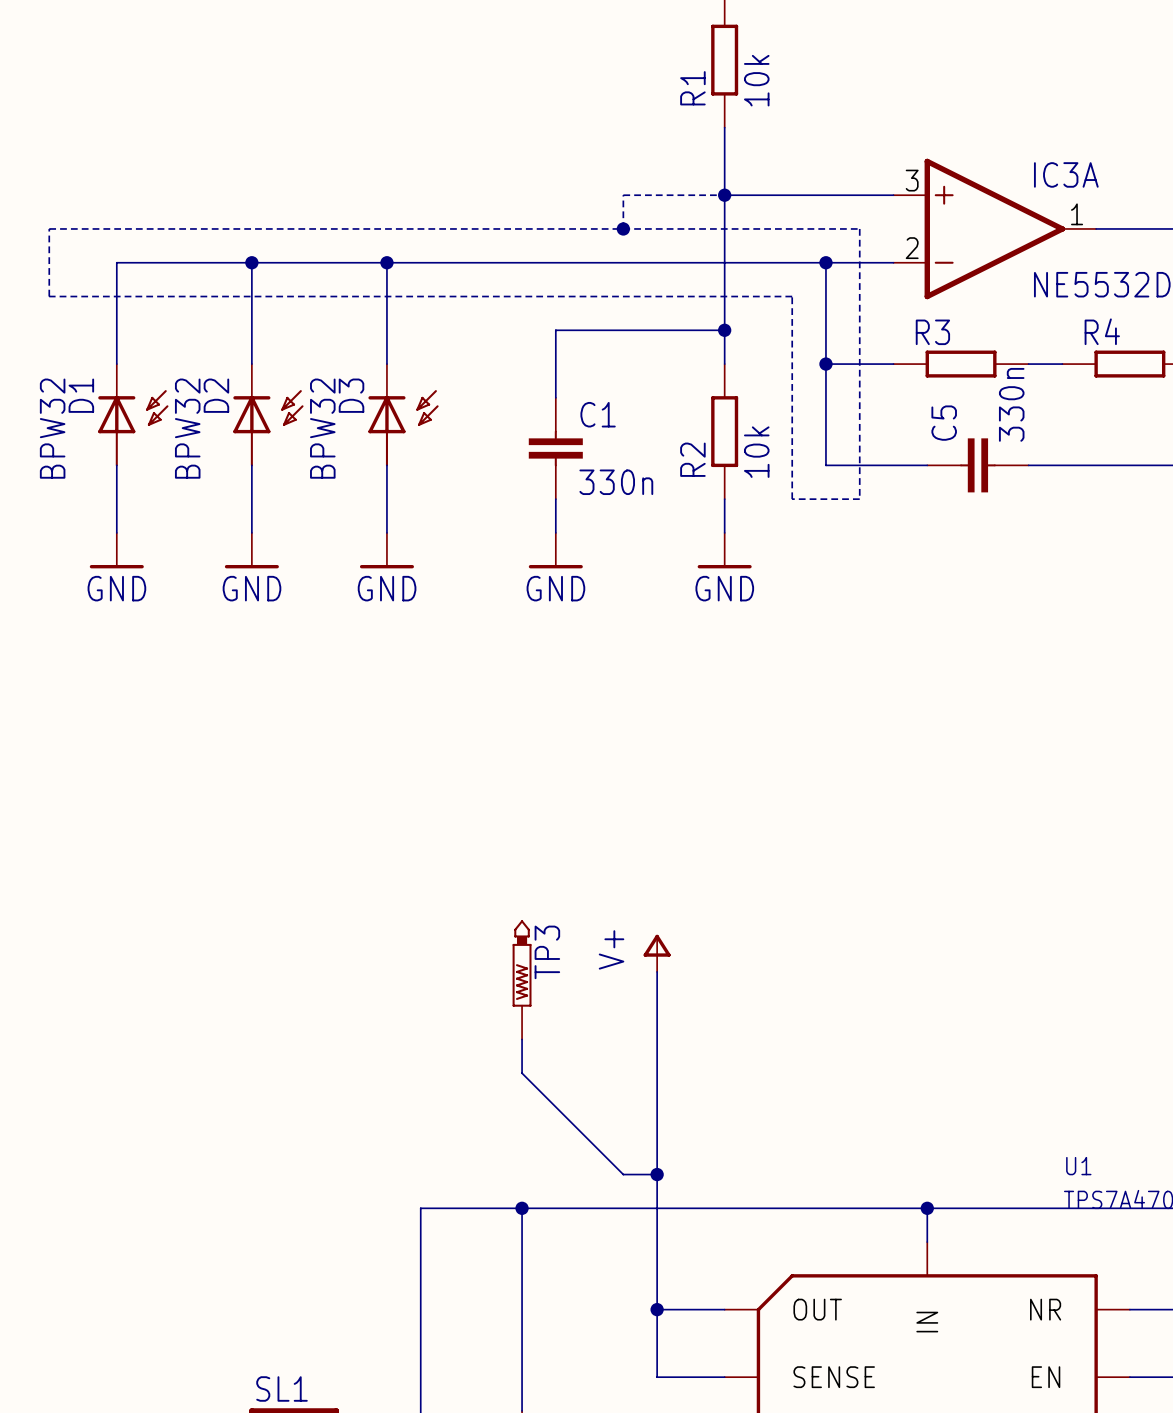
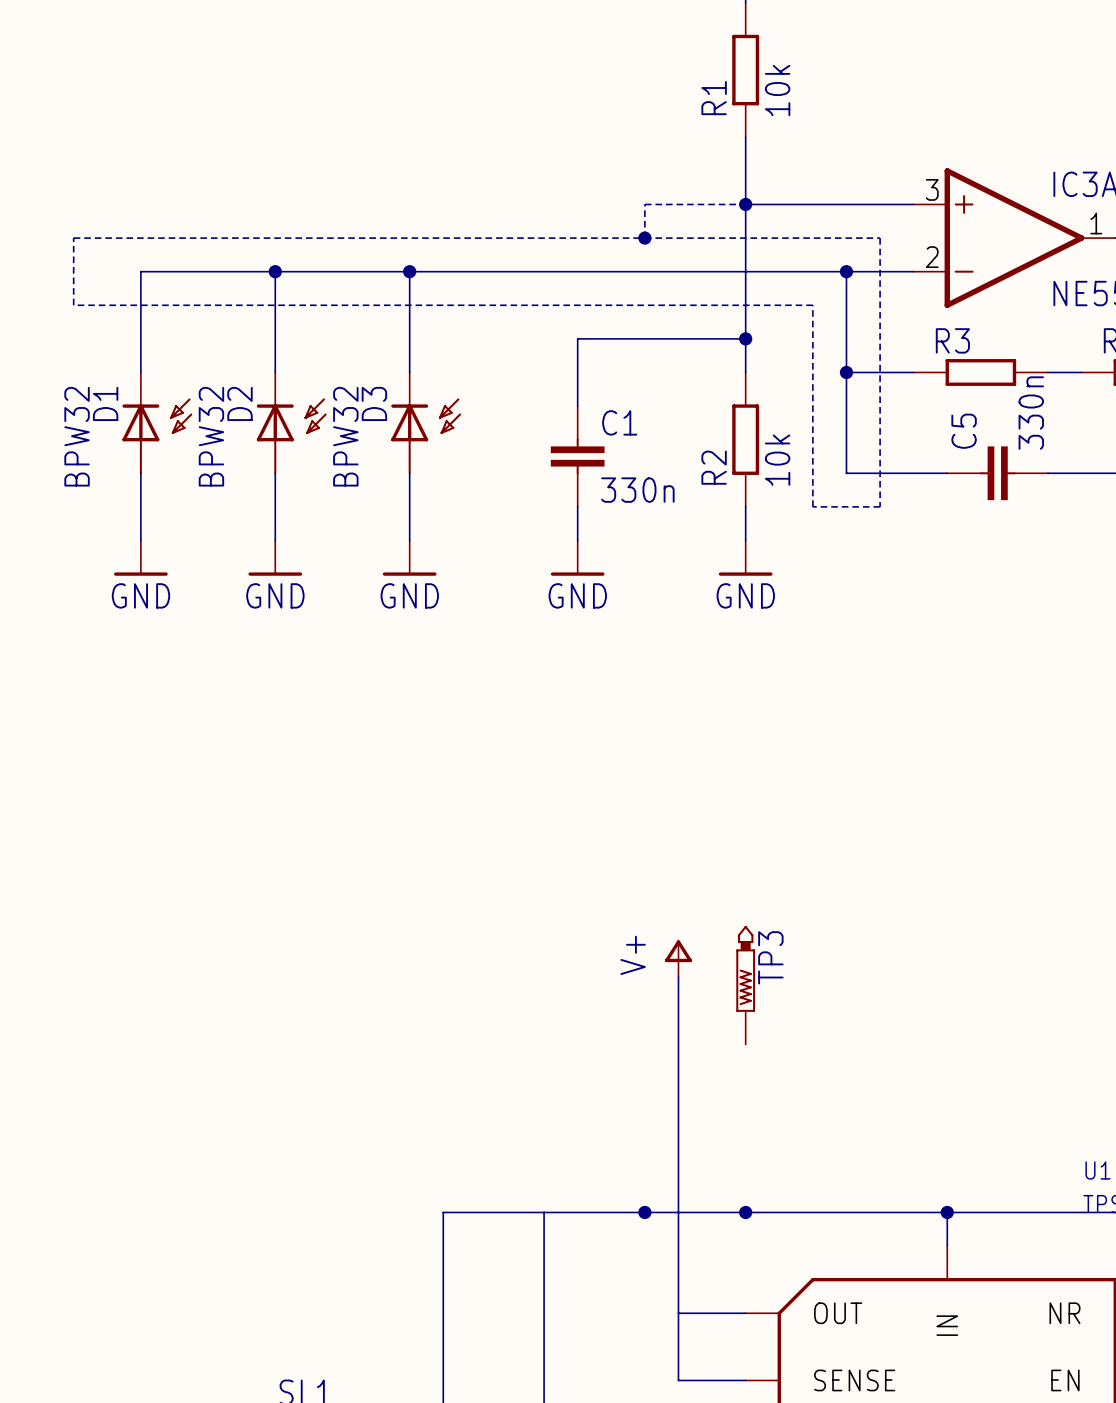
TP3 position: (522, 979) -> (745, 985)
wire: (522, 1039) (522, 1073) (623, 1174) (657, 1174) -> none
junction: (657, 1174) -> none
junction: (522, 1208) -> none
junction: none -> (644, 1212)
junction: none -> (745, 1212)
junction: (657, 1309) -> none

